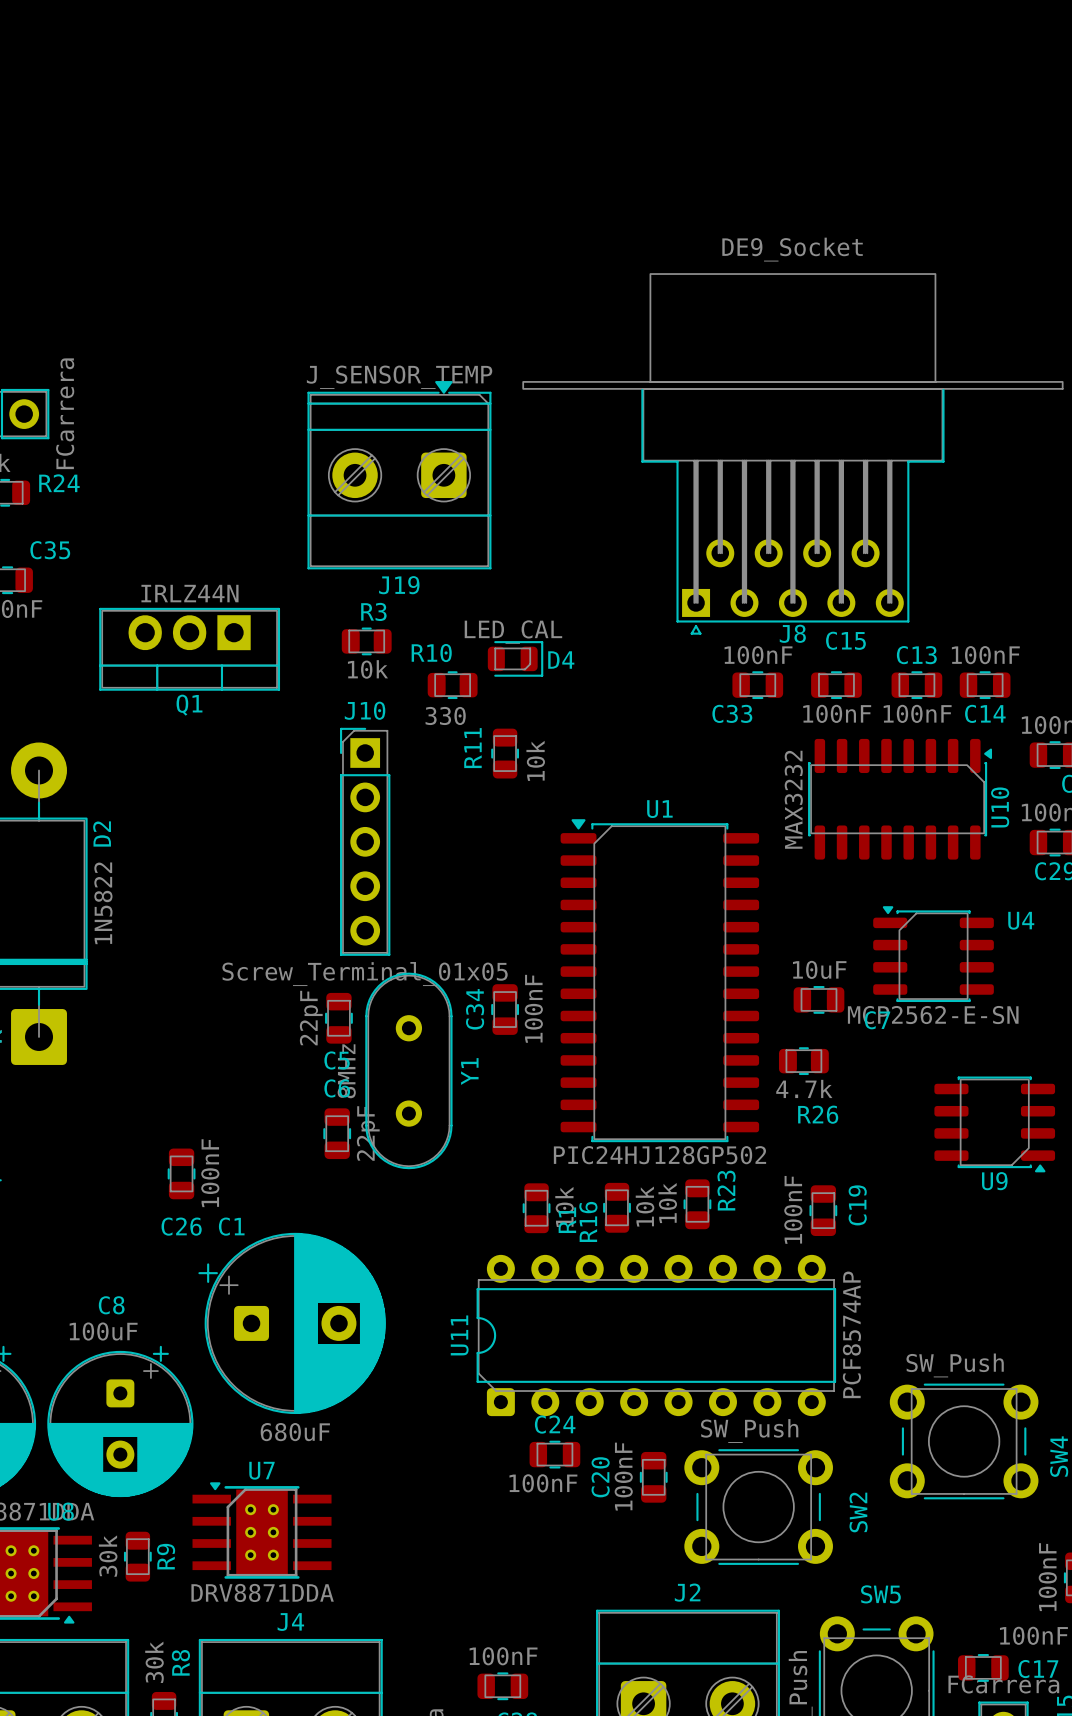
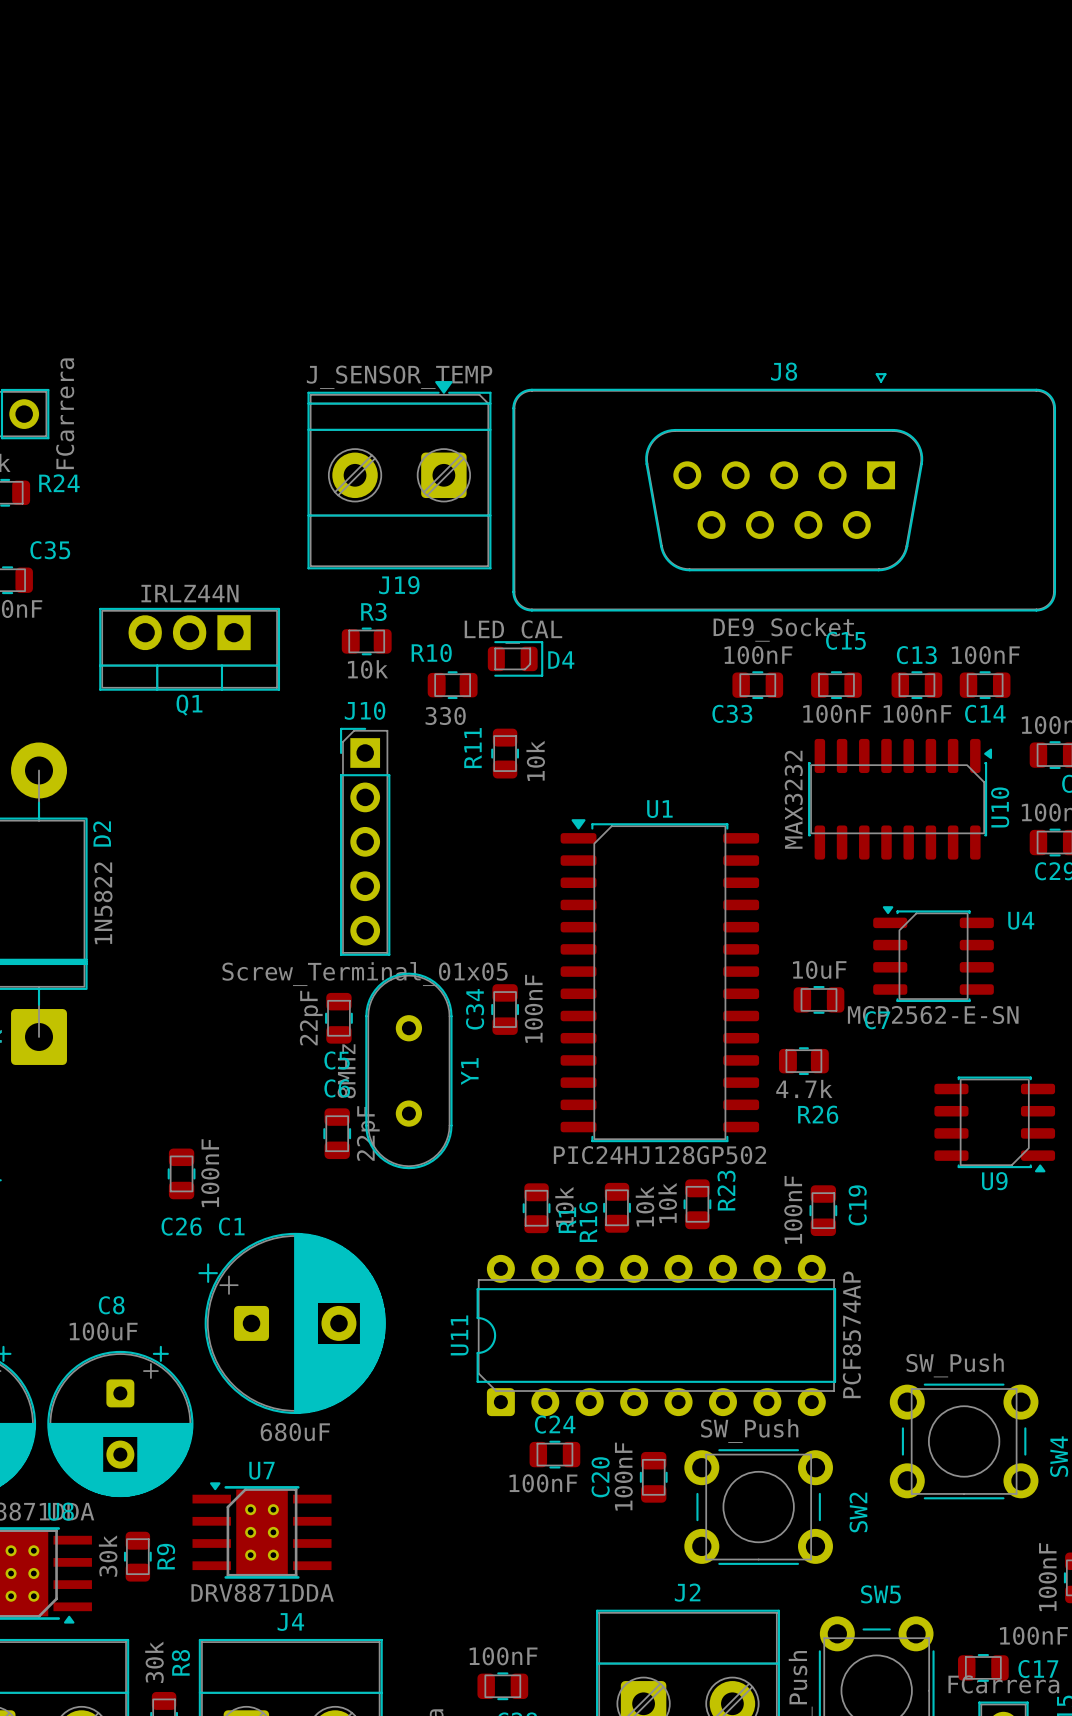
J8 value position: DE9_Socket (792, 249) -> DE9_Socket (783, 629)
J8 footprint: [522, 273, 1064, 635] -> [512, 373, 1057, 612]
J8 name position: J8 (792, 633) -> J8 (784, 371)

